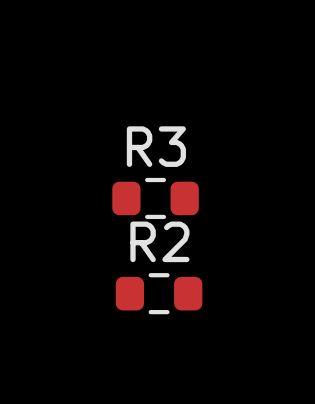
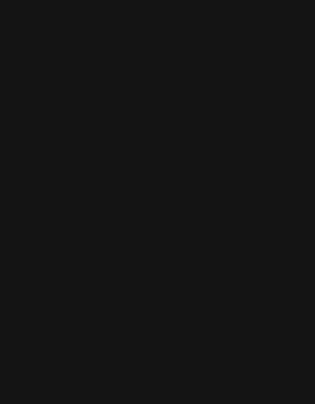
R3: (155, 198) -> none
R2: (159, 293) -> none

